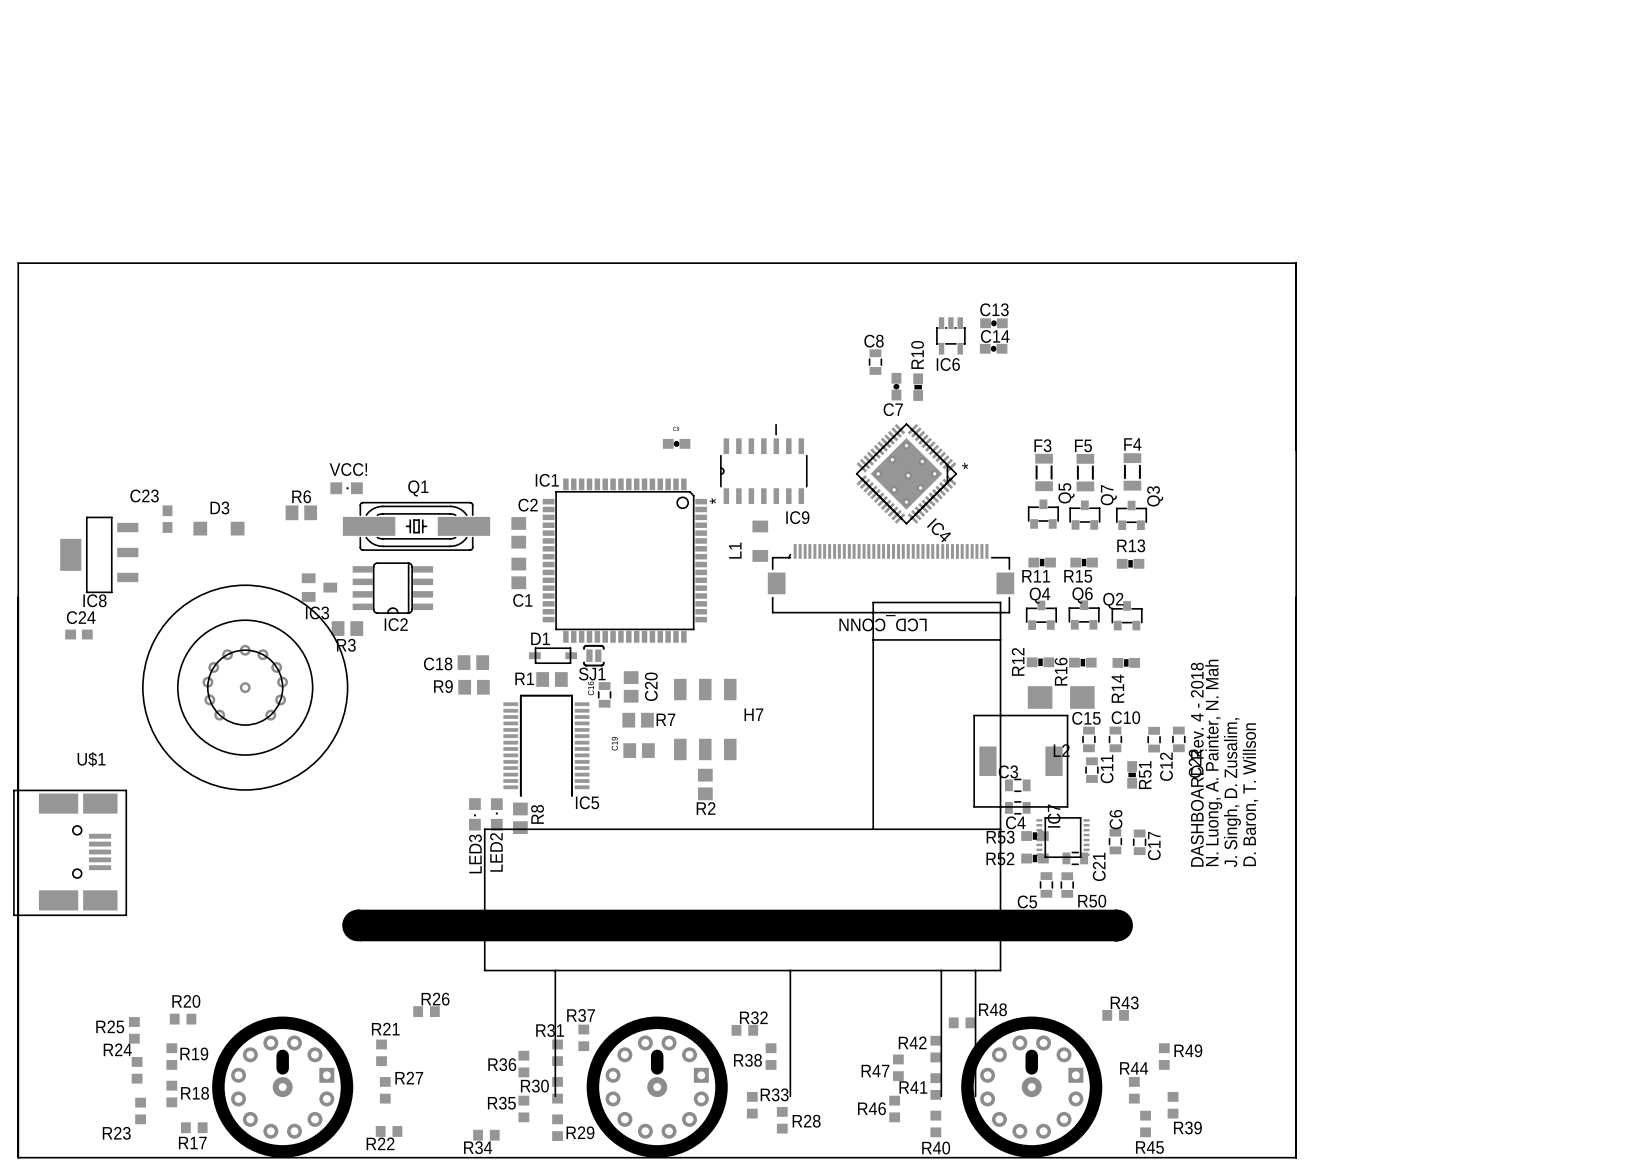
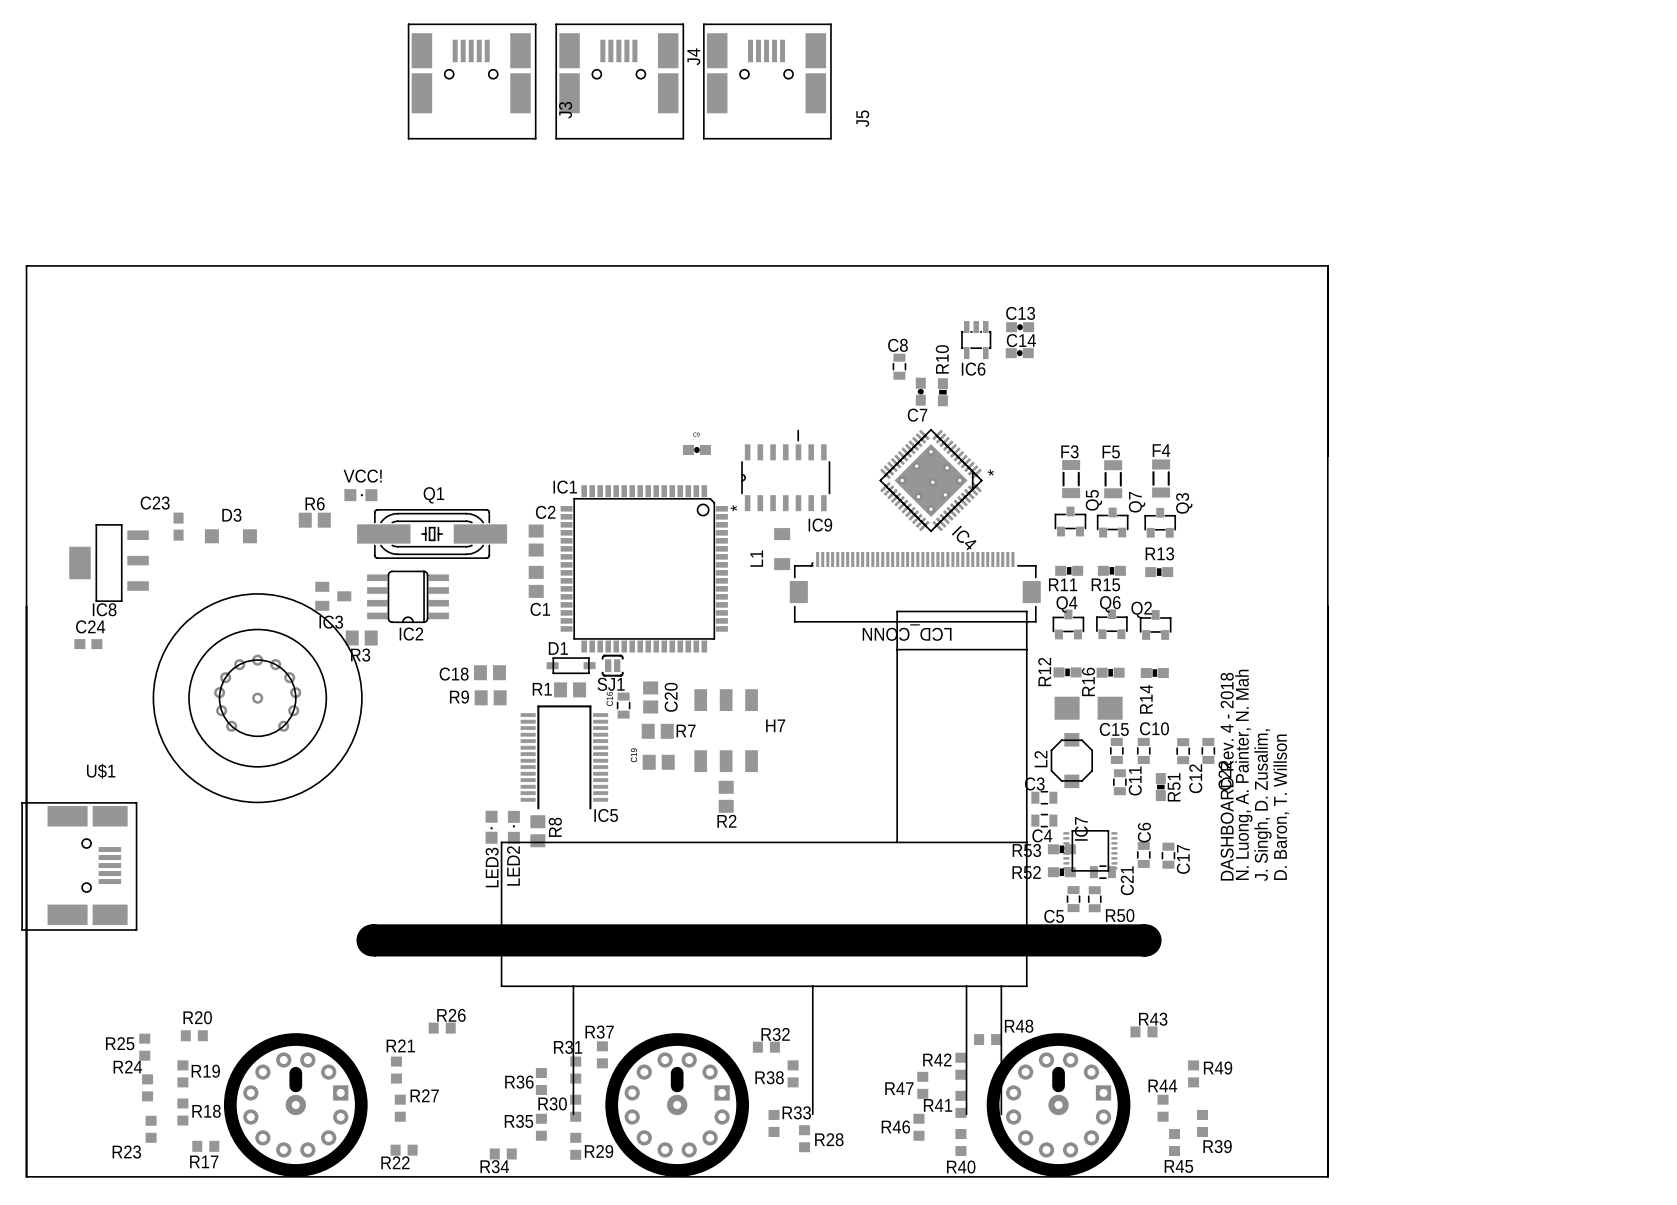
J3: none -> (472, 81)
J4: none -> (619, 81)
J5: none -> (767, 81)
L2 footprint: [973, 714, 1069, 808] -> [1050, 733, 1093, 789]
L2 name position: L2 (1061, 750) -> L2 (1040, 759)

